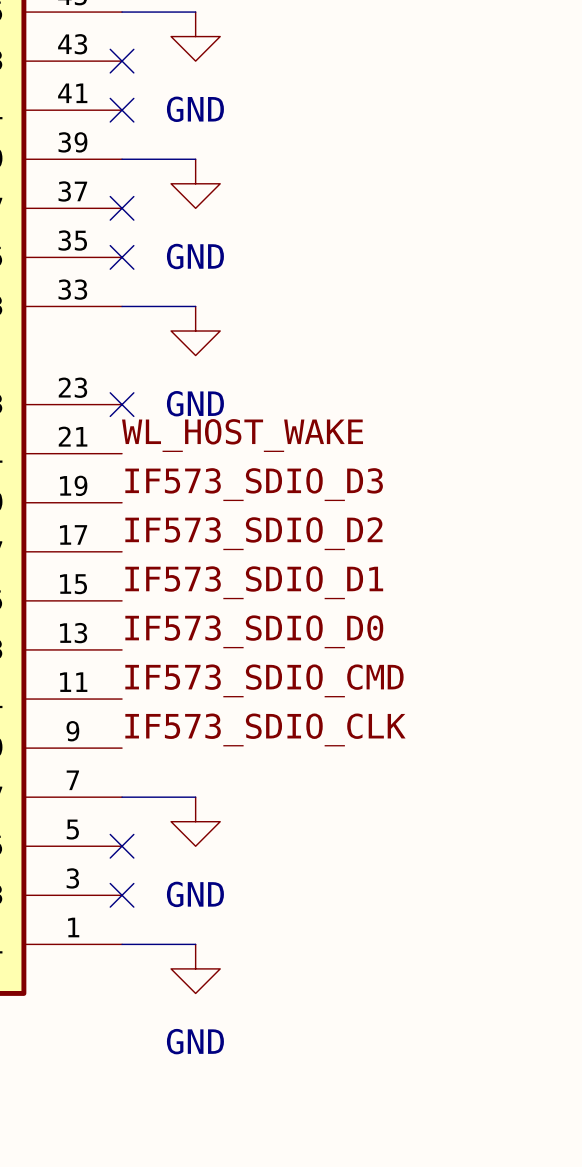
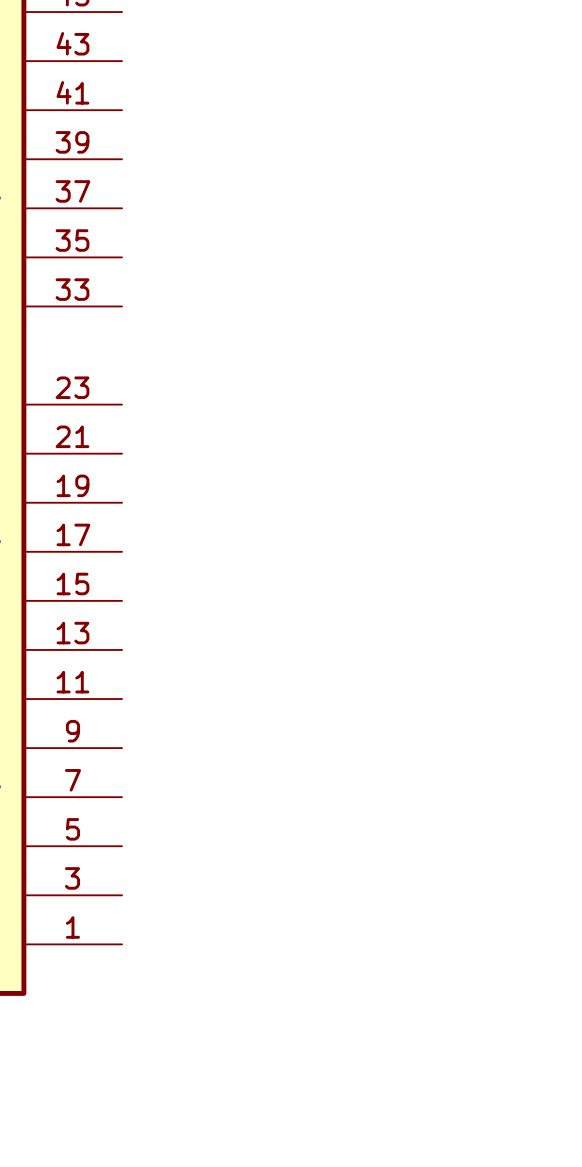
wire: (122, 12) (195, 12) -> none
power symbol: GND (195, 36) -> none
no-connect mark: (122, 61) -> none
no-connect mark: (122, 110) -> none
wire: (122, 159) (195, 159) -> none
power symbol: GND (195, 183) -> none
no-connect mark: (122, 208) -> none
no-connect mark: (122, 257) -> none
wire: (122, 306) (195, 306) -> none
power symbol: GND (195, 331) -> none
no-connect mark: (122, 404) -> none
label: WL_HOST_WAKE (242, 435) -> none
label: IF573_SDIO_D3 (254, 484) -> none
label: IF573_SDIO_D2 (253, 533) -> none
label: IF573_SDIO_D1 (254, 582) -> none
label: IF573_SDIO_D0 (254, 631) -> none
label: IF573_SDIO_CMD (264, 680) -> none
label: IF573_SDIO_CLK (265, 729) -> none
wire: (122, 797) (195, 797) -> none
power symbol: GND (195, 821) -> none
no-connect mark: (122, 846) -> none
no-connect mark: (122, 895) -> none
wire: (122, 944) (195, 944) -> none
power symbol: GND (195, 968) -> none

